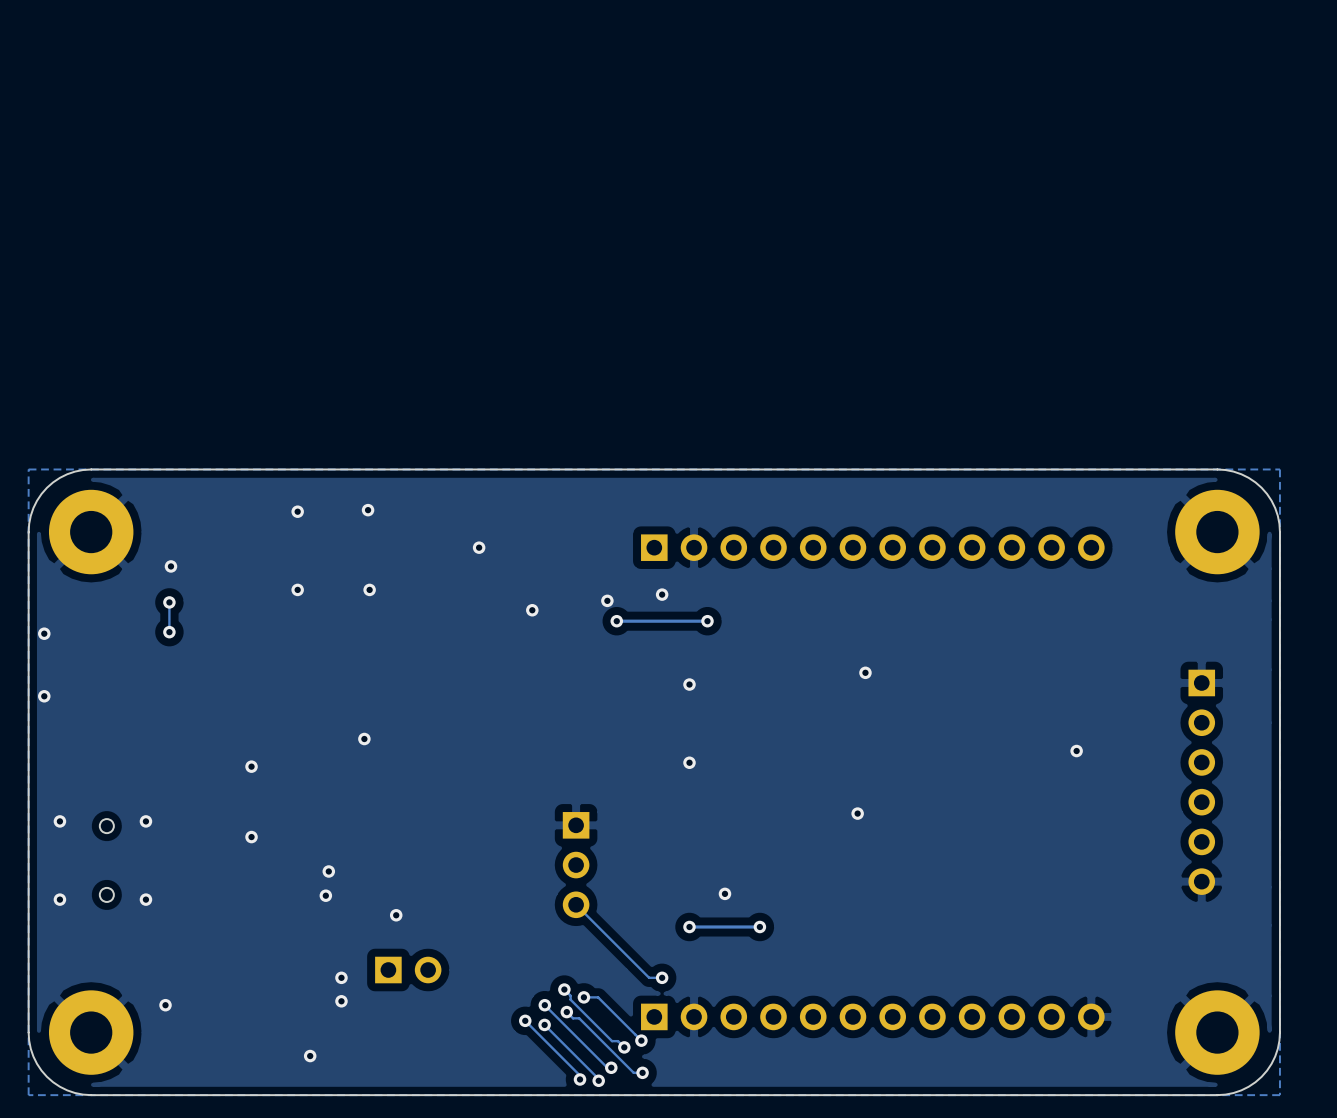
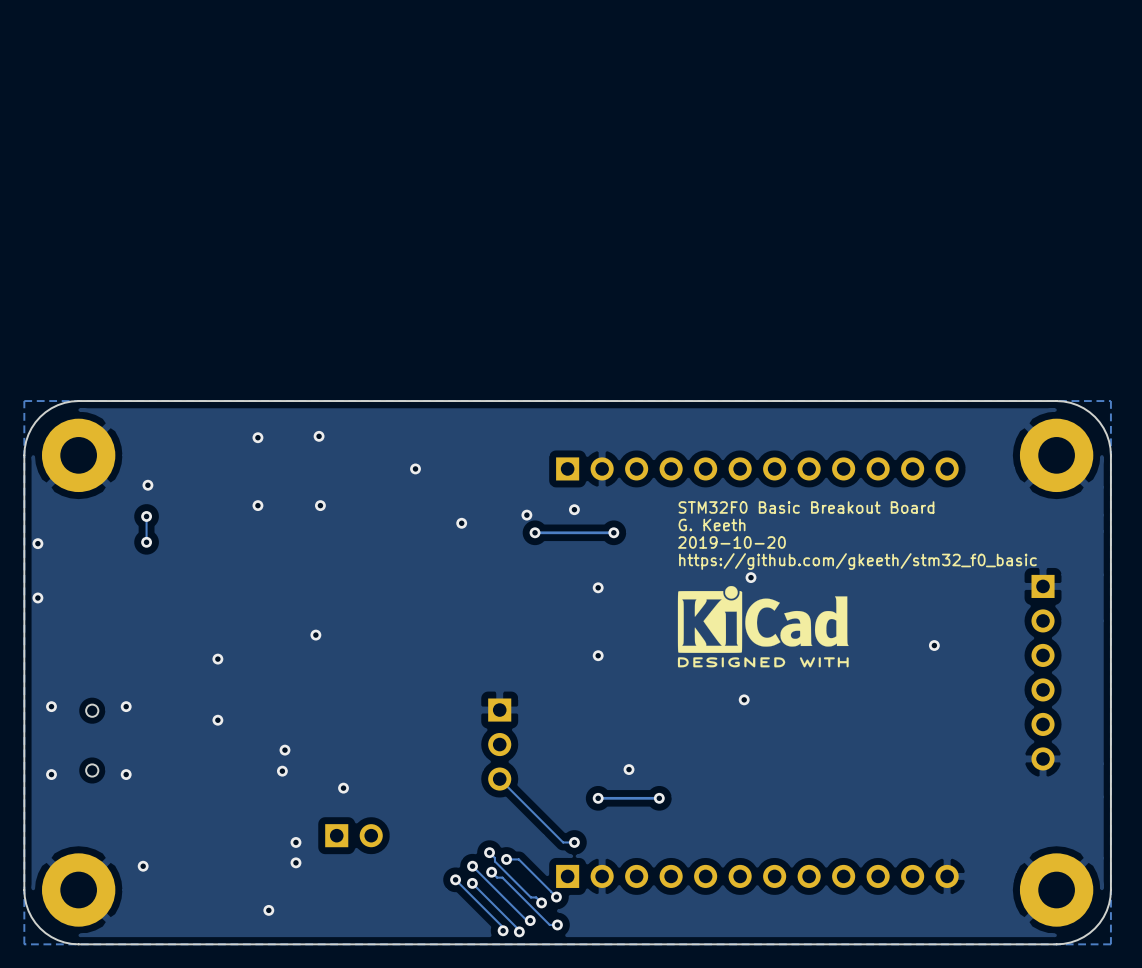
text: none -> STM32F0 Basic Breakout Board (806, 507)
text: none -> G. Keeth (712, 524)
text: none -> 2019-10-20 (731, 542)
text: none -> https://github.com/gkeeth/stm32_f0_basic (857, 561)
drawing: none -> [677, 585, 849, 668]

